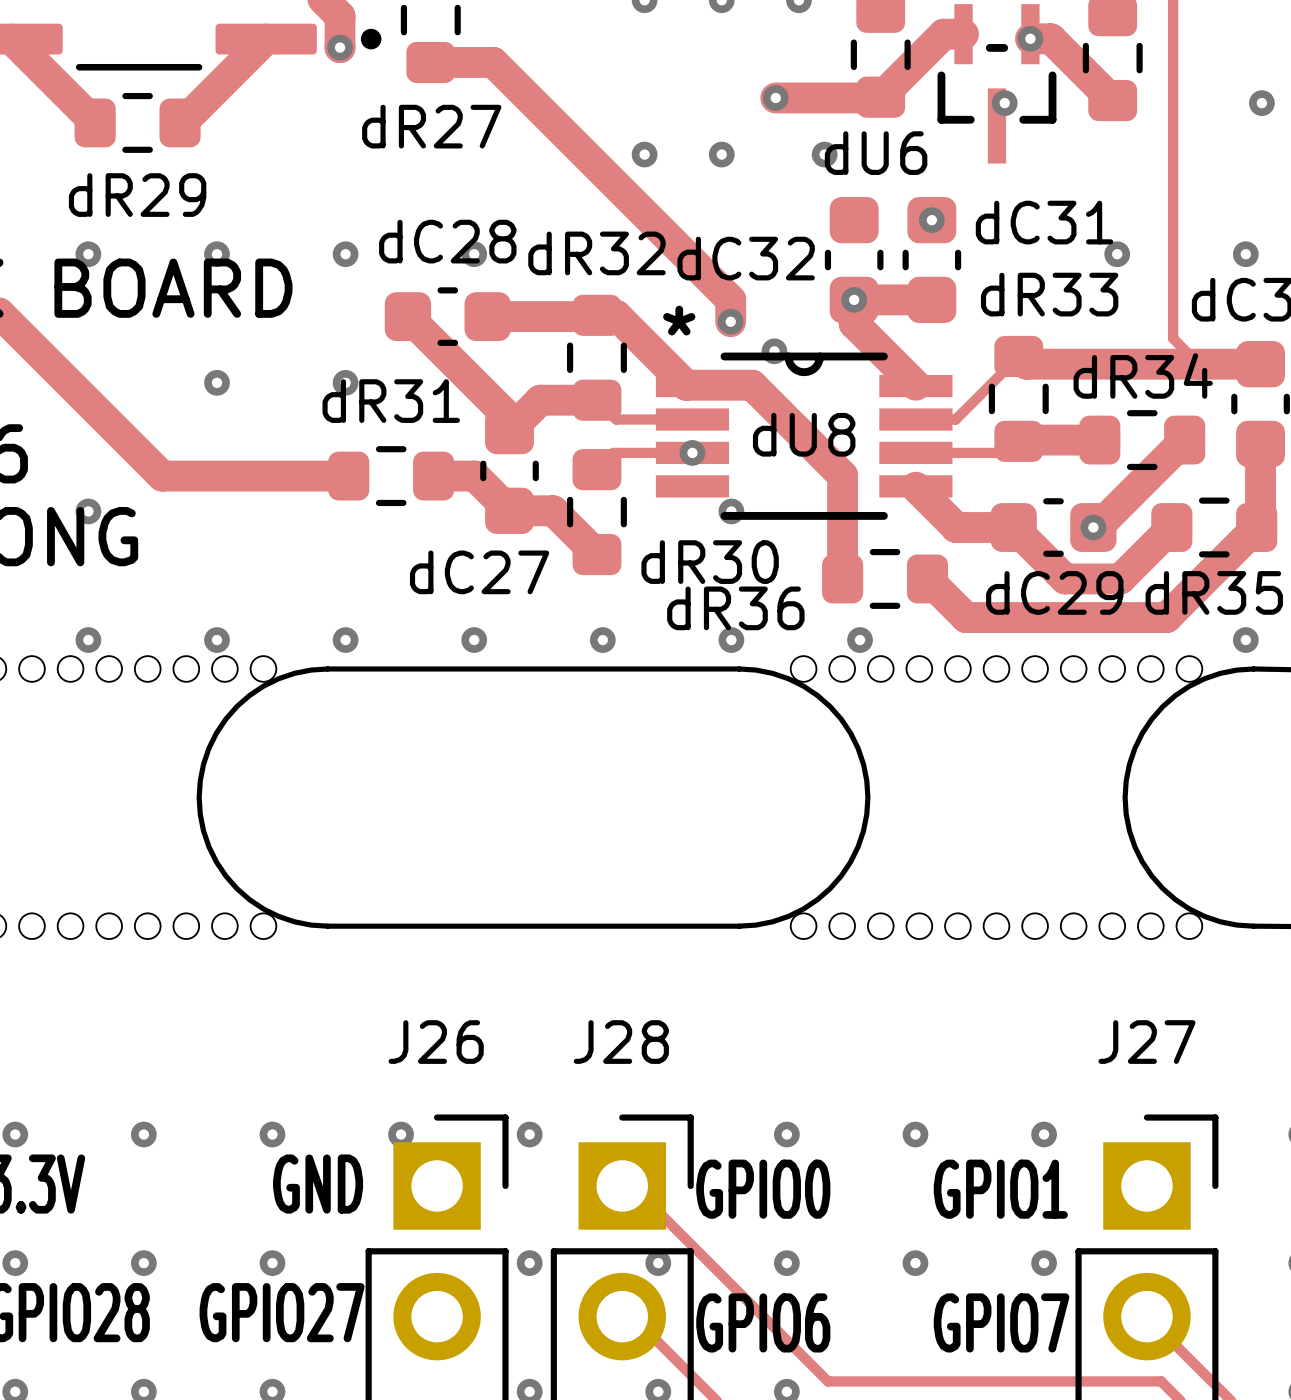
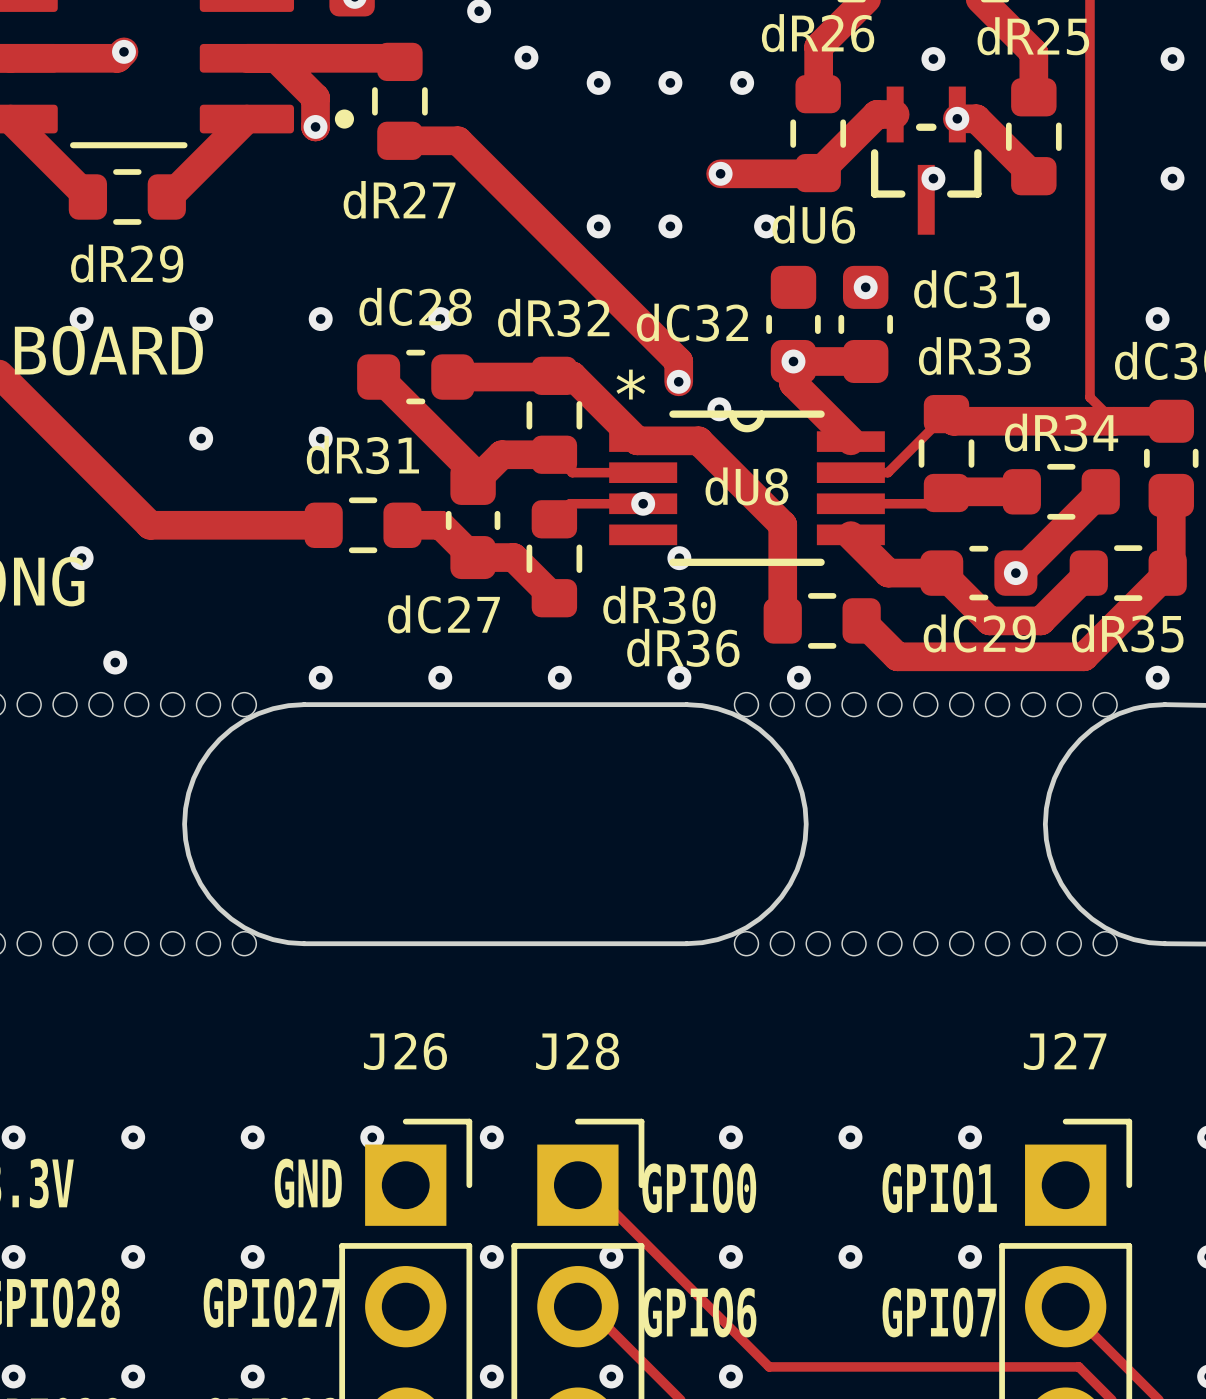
via position: (88, 640) -> (115, 662)
via: (217, 640) -> none

